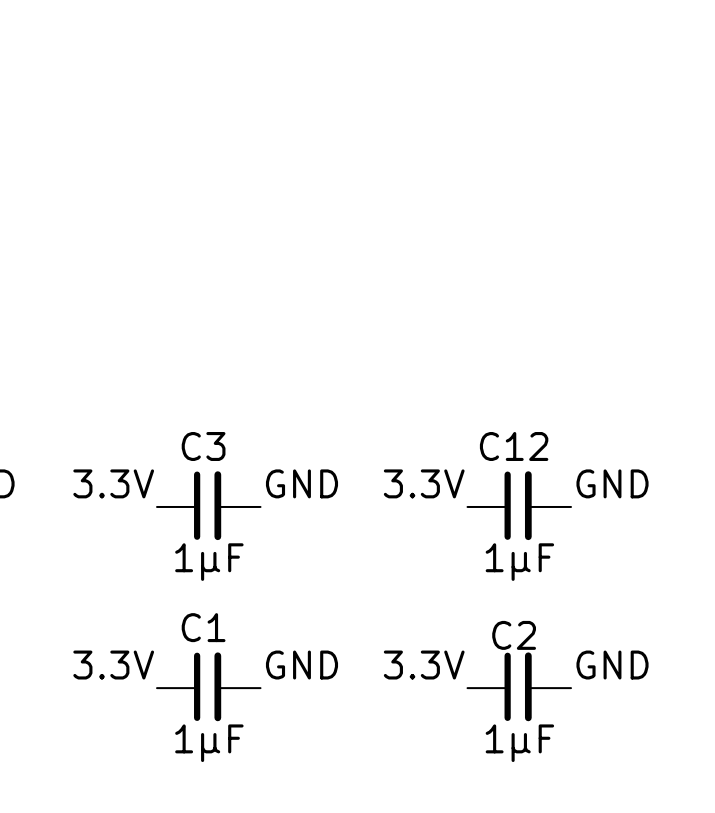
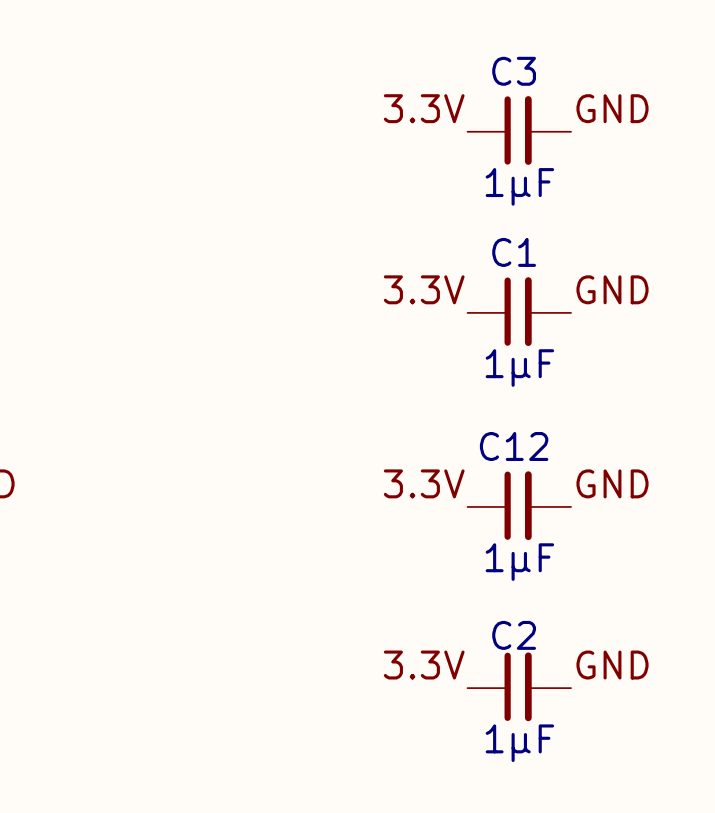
label: none -> 3.3V (424, 108)
label: none -> GND (612, 108)
label: none -> 3.3V (424, 289)
label: none -> GND (612, 289)
label: 3.3V (113, 483) -> none
label: GND (301, 483) -> none
C3 position: (208, 505) -> (519, 130)
label: 3.3V (113, 665) -> none
label: GND (301, 665) -> none
C1 position: (208, 686) -> (519, 311)

